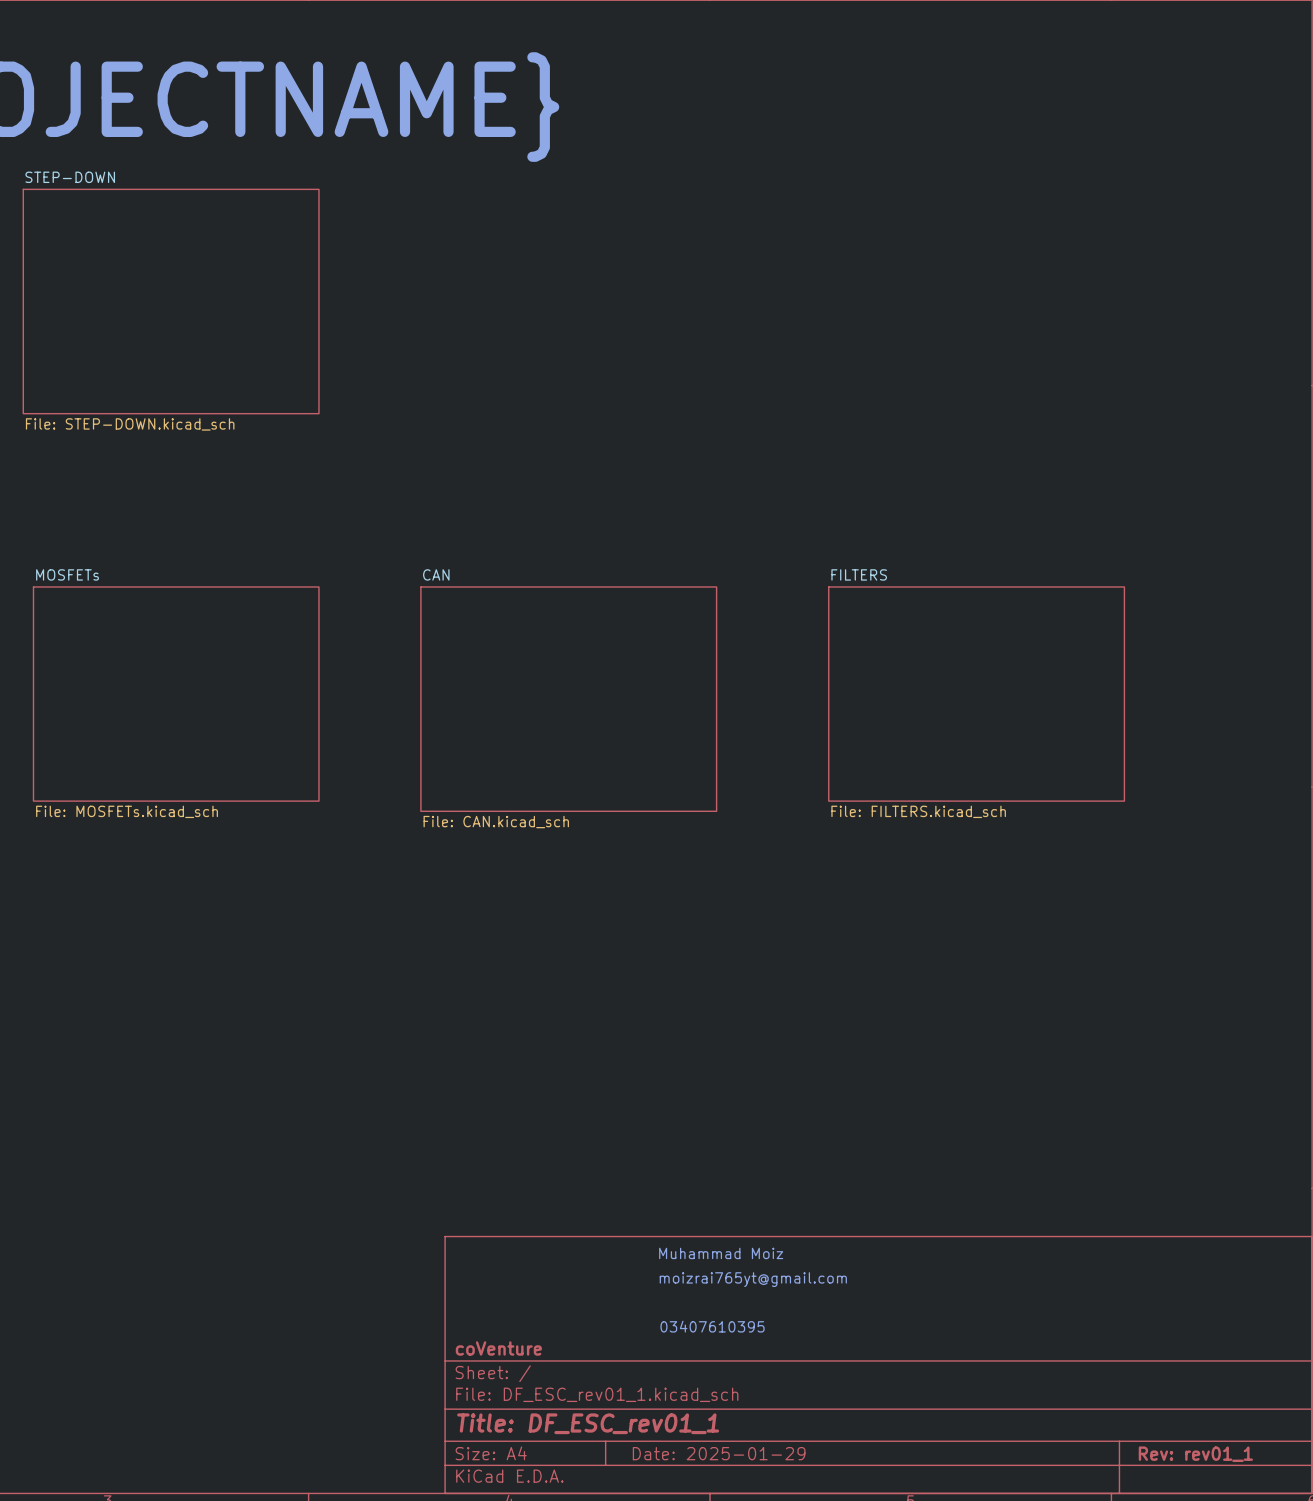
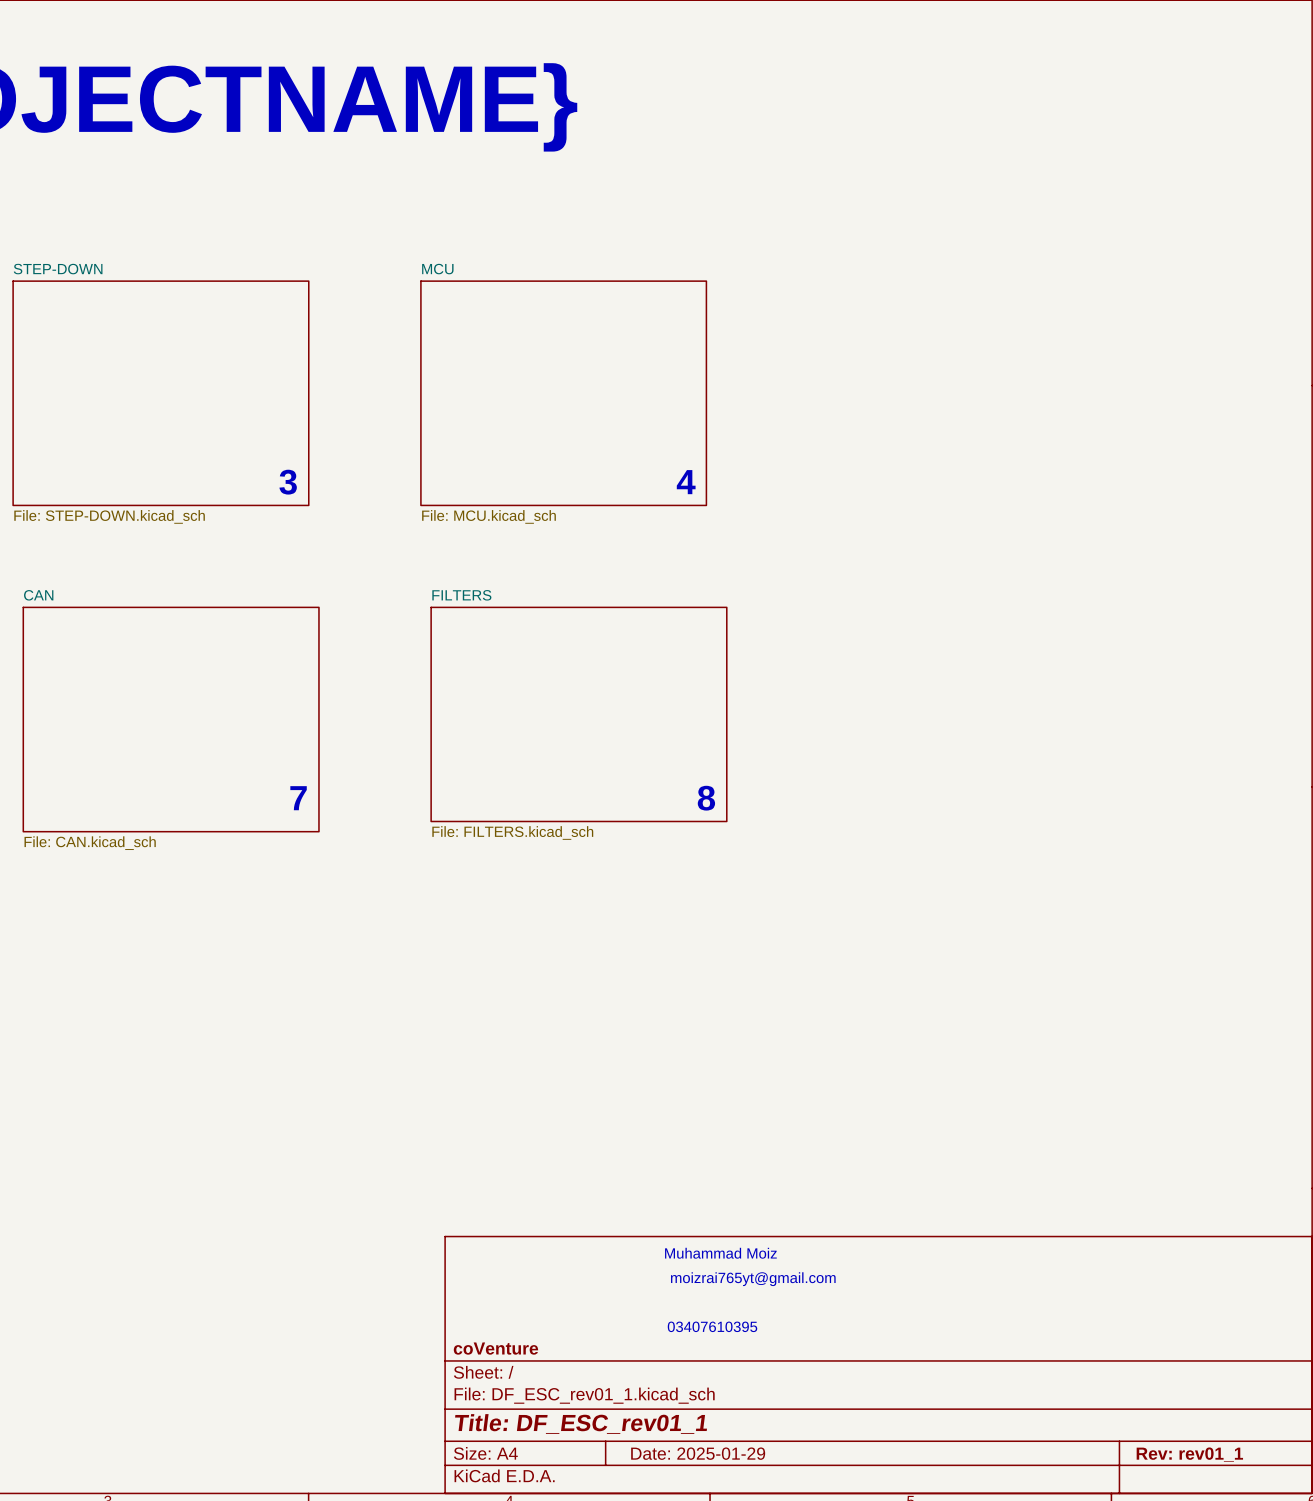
sheet STEP-DOWN position: (171, 301) -> (160, 393)
sheet MCU: none -> File: MCU.kicad_sch (563, 393)
text: none -> 4 (686, 482)
text: none -> 3 (288, 482)
sheet MOSFETs: File: MOSFETs.kicad_sch (176, 694) -> none
sheet FILTERS: File: FILTERS.kicad_sch (976, 694) -> none
sheet CAN: File: CAN.kicad_sch (568, 699) -> none
sheet FILTERS: none -> File: FILTERS.kicad_sch (578, 714)
sheet CAN: none -> File: CAN.kicad_sch (171, 719)
text: none -> 7 (298, 798)
text: none -> 8 (706, 798)

